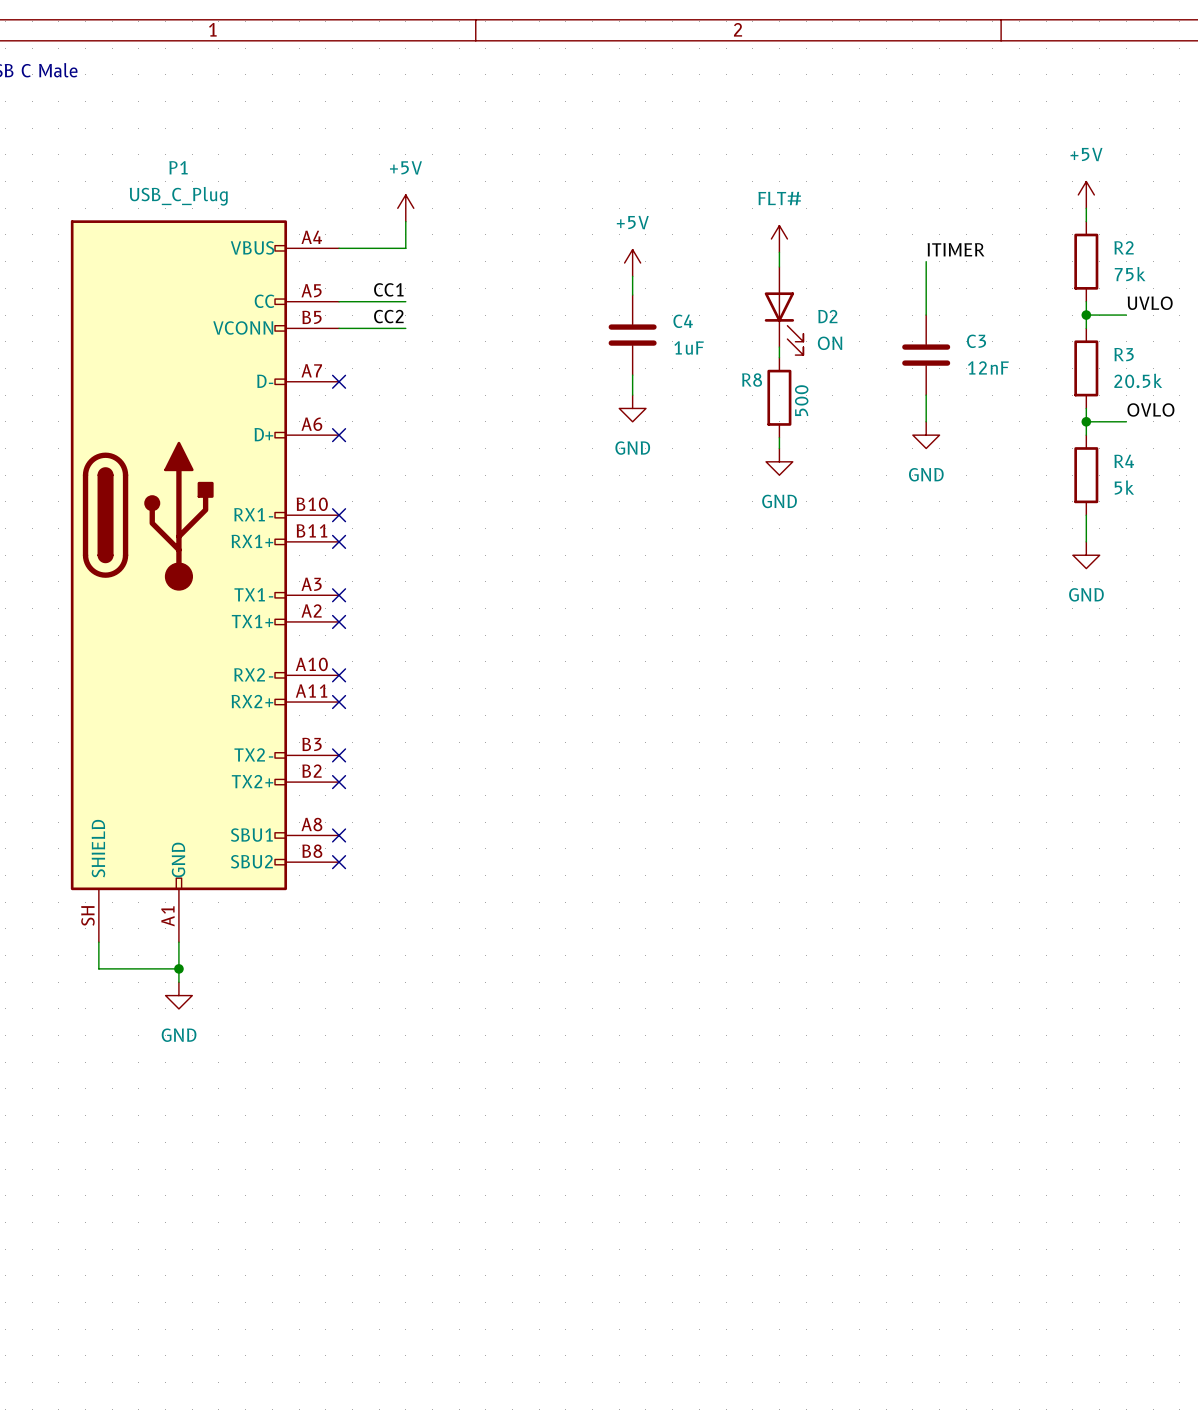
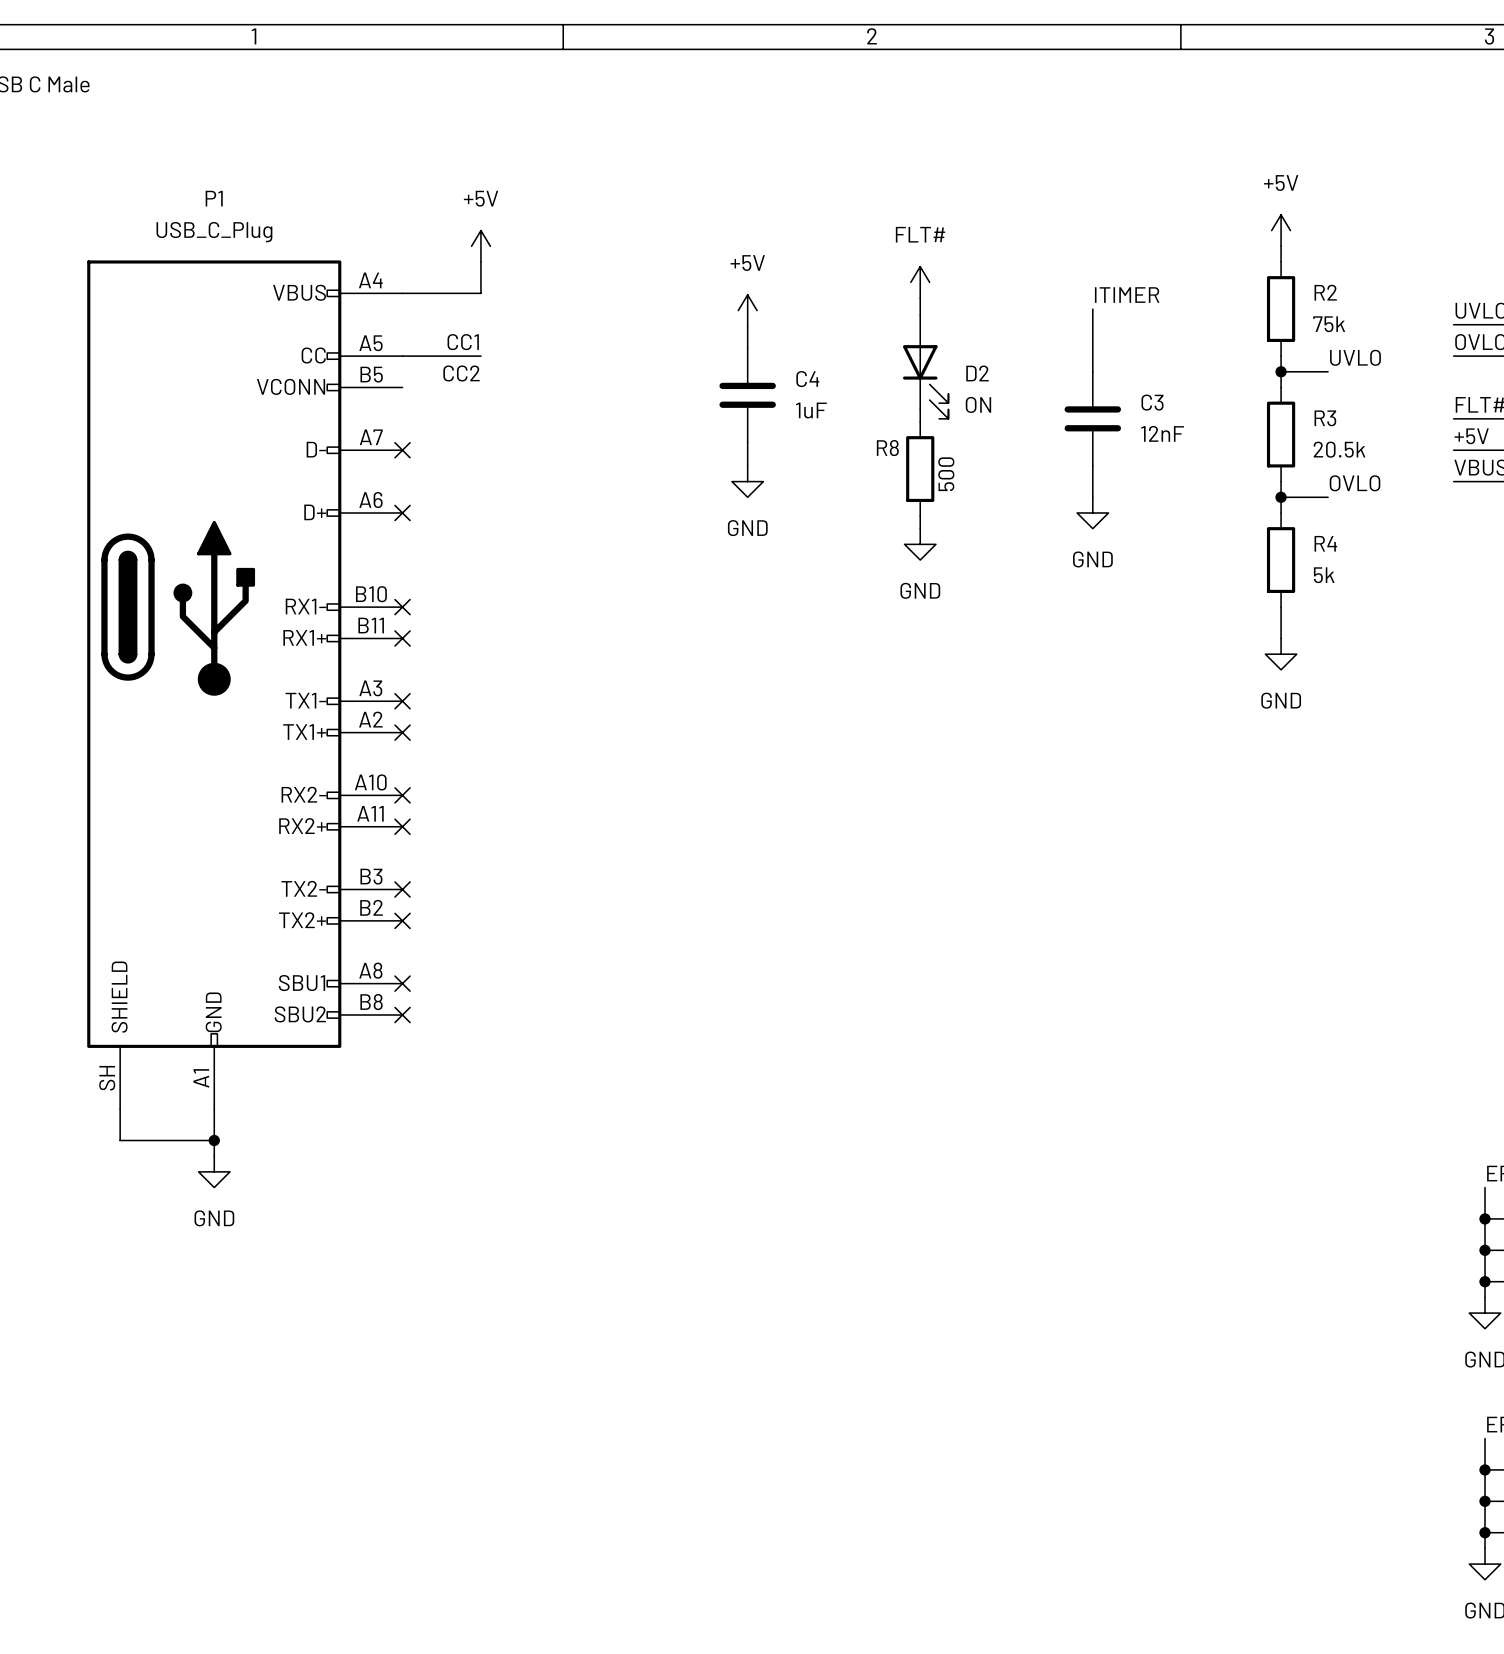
wire: (339, 328) (405, 328) -> none

